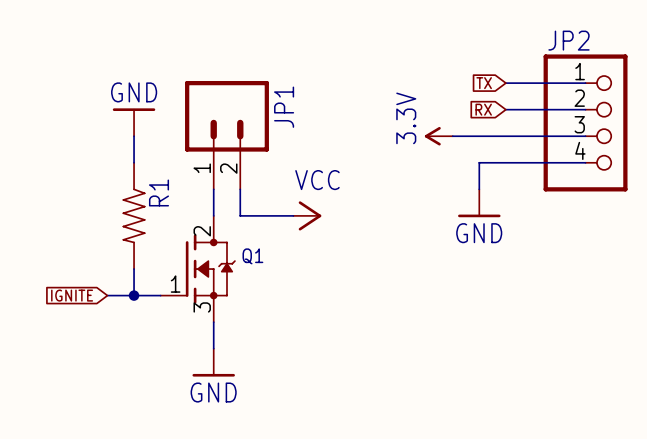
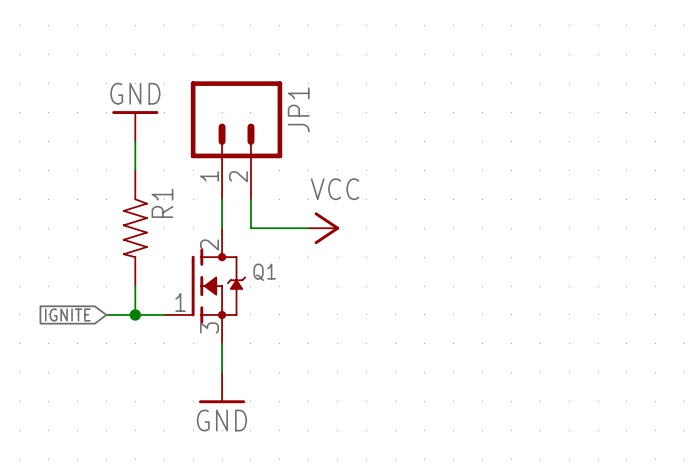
global label: TX (484, 83) -> none
wire: (505, 83) (585, 83) -> none
global label: RX (483, 109) -> none
wire: (505, 109) (585, 109) -> none
JP2: (585, 122) -> none
power symbol: 3.3V (438, 136) -> none
wire: (452, 136) (585, 136) -> none
wire: (585, 162) (479, 162) (479, 189) -> none
power symbol: GND (479, 203) -> none

